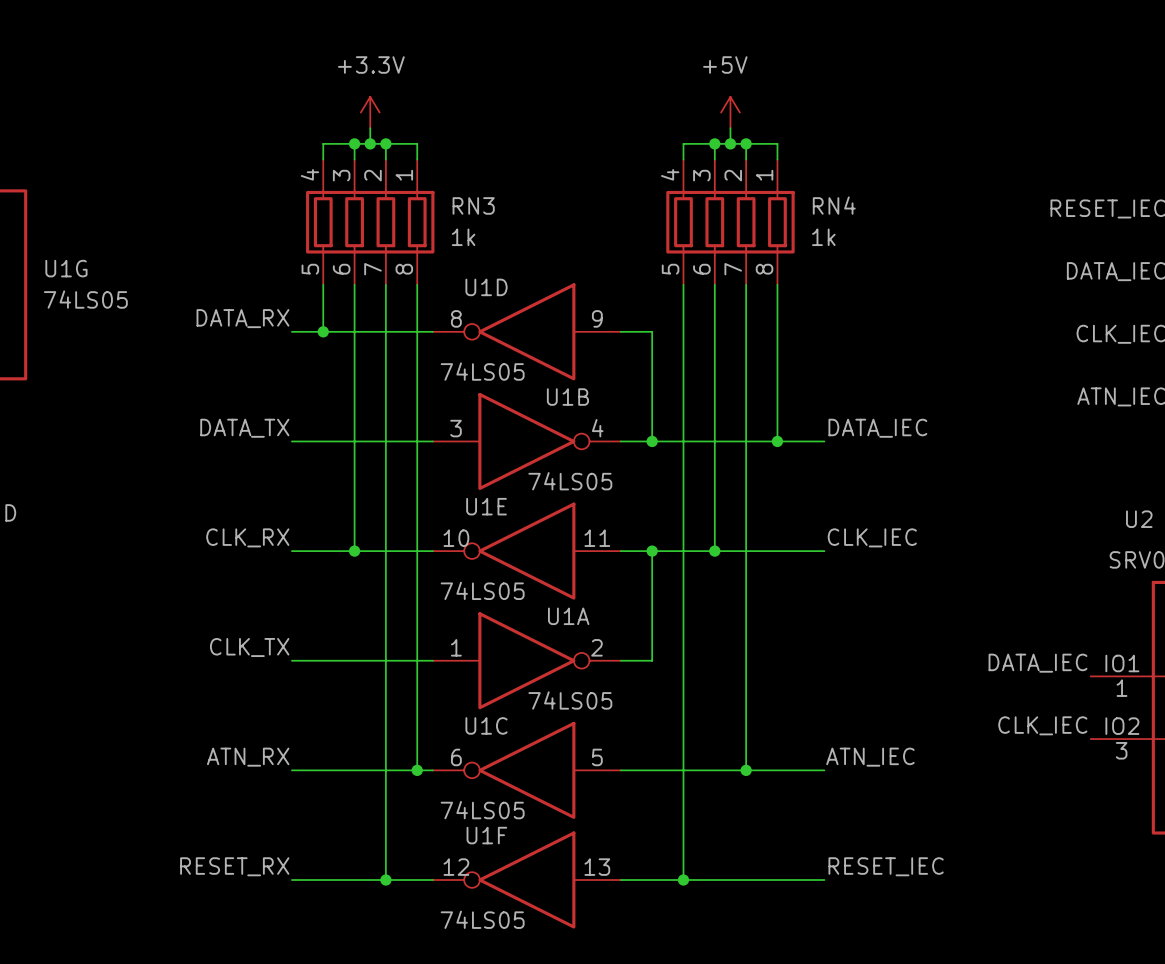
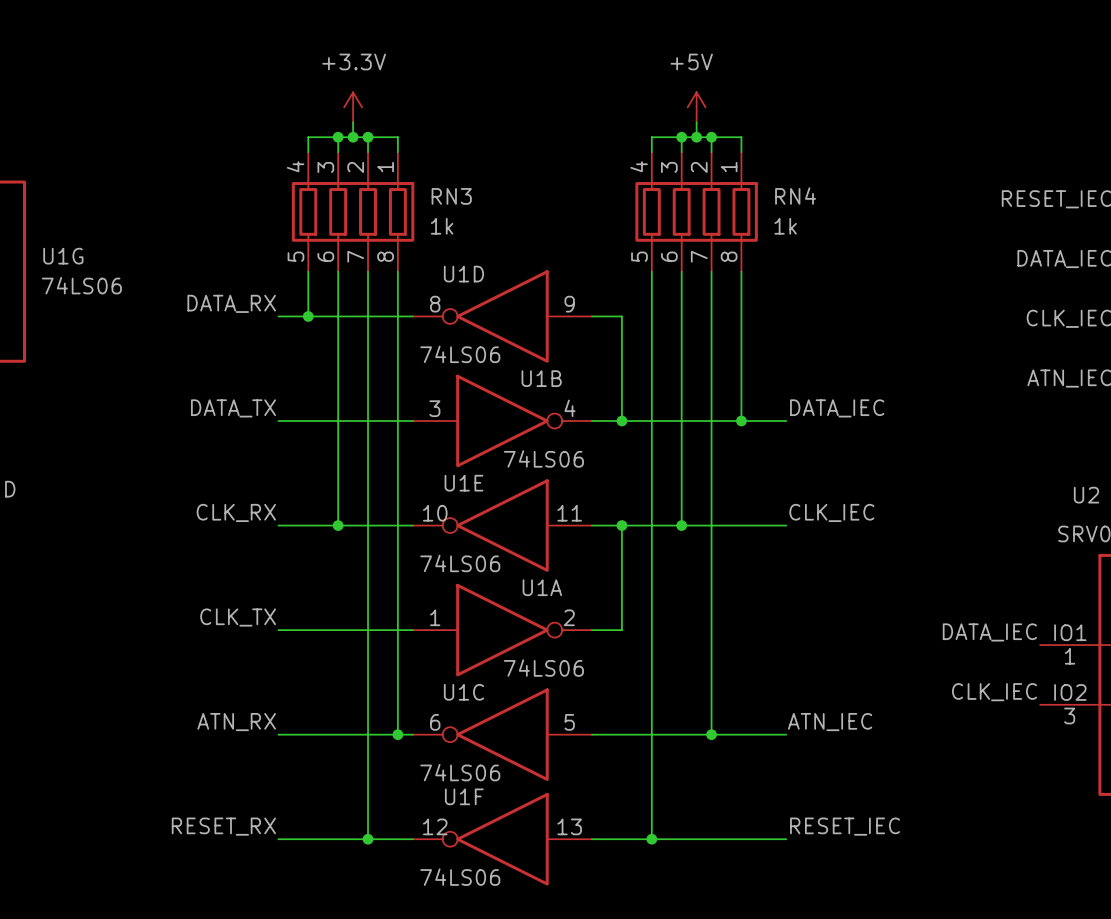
U1G value: 74LS05 (85, 299) -> 74LS06 (81, 285)
U1D value: 74LS05 (482, 371) -> 74LS06 (460, 354)
U1B value: 74LS05 (570, 481) -> 74LS06 (543, 458)
U1E value: 74LS05 (482, 590) -> 74LS06 (460, 563)
U1A value: 74LS05 (570, 700) -> 74LS06 (543, 668)
U1C value: 74LS05 (482, 810) -> 74LS06 (460, 772)
U1F value: 74LS05 (482, 919) -> 74LS06 (460, 877)

